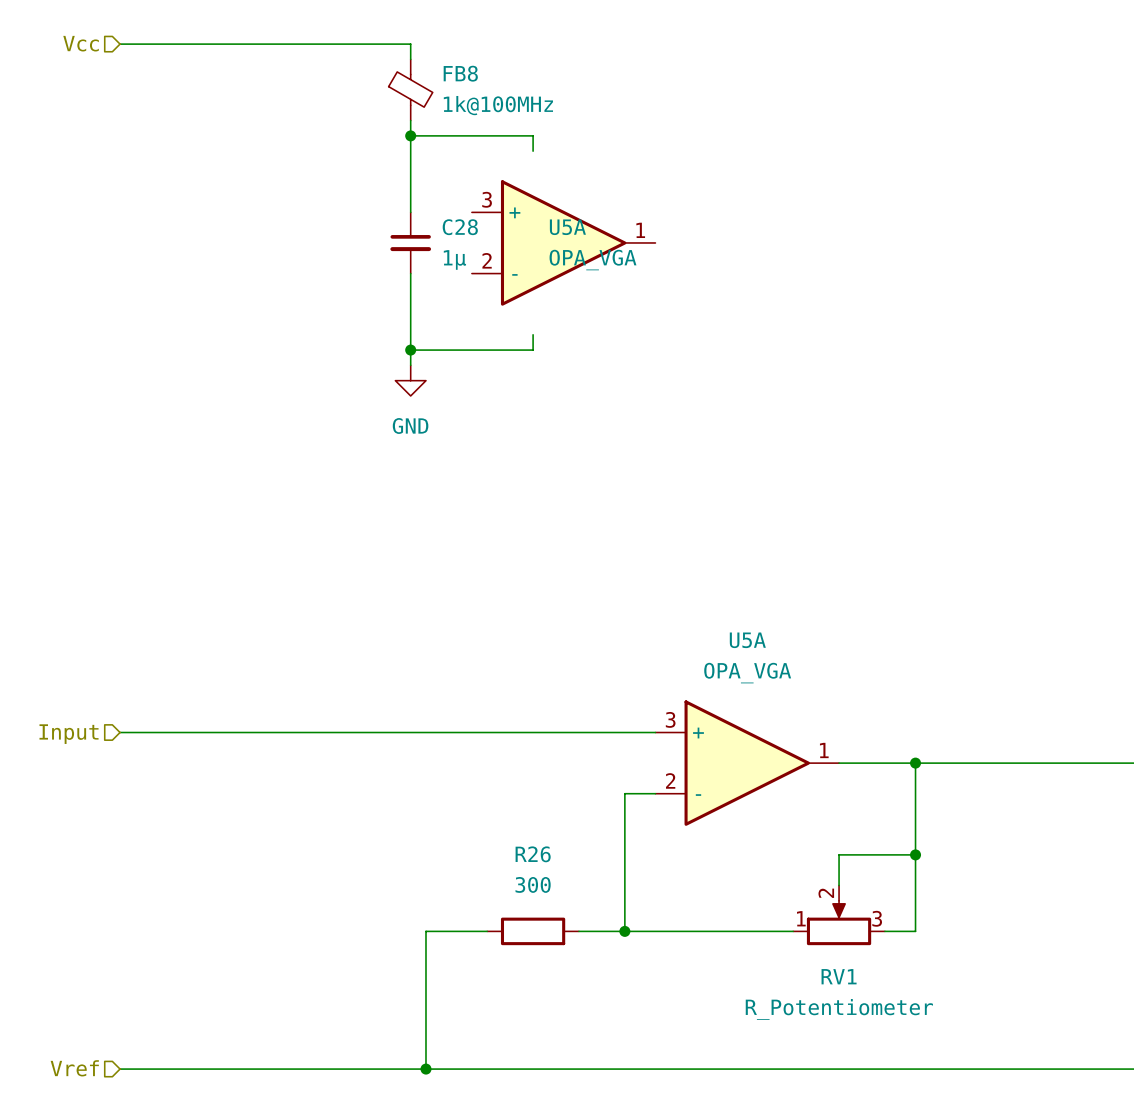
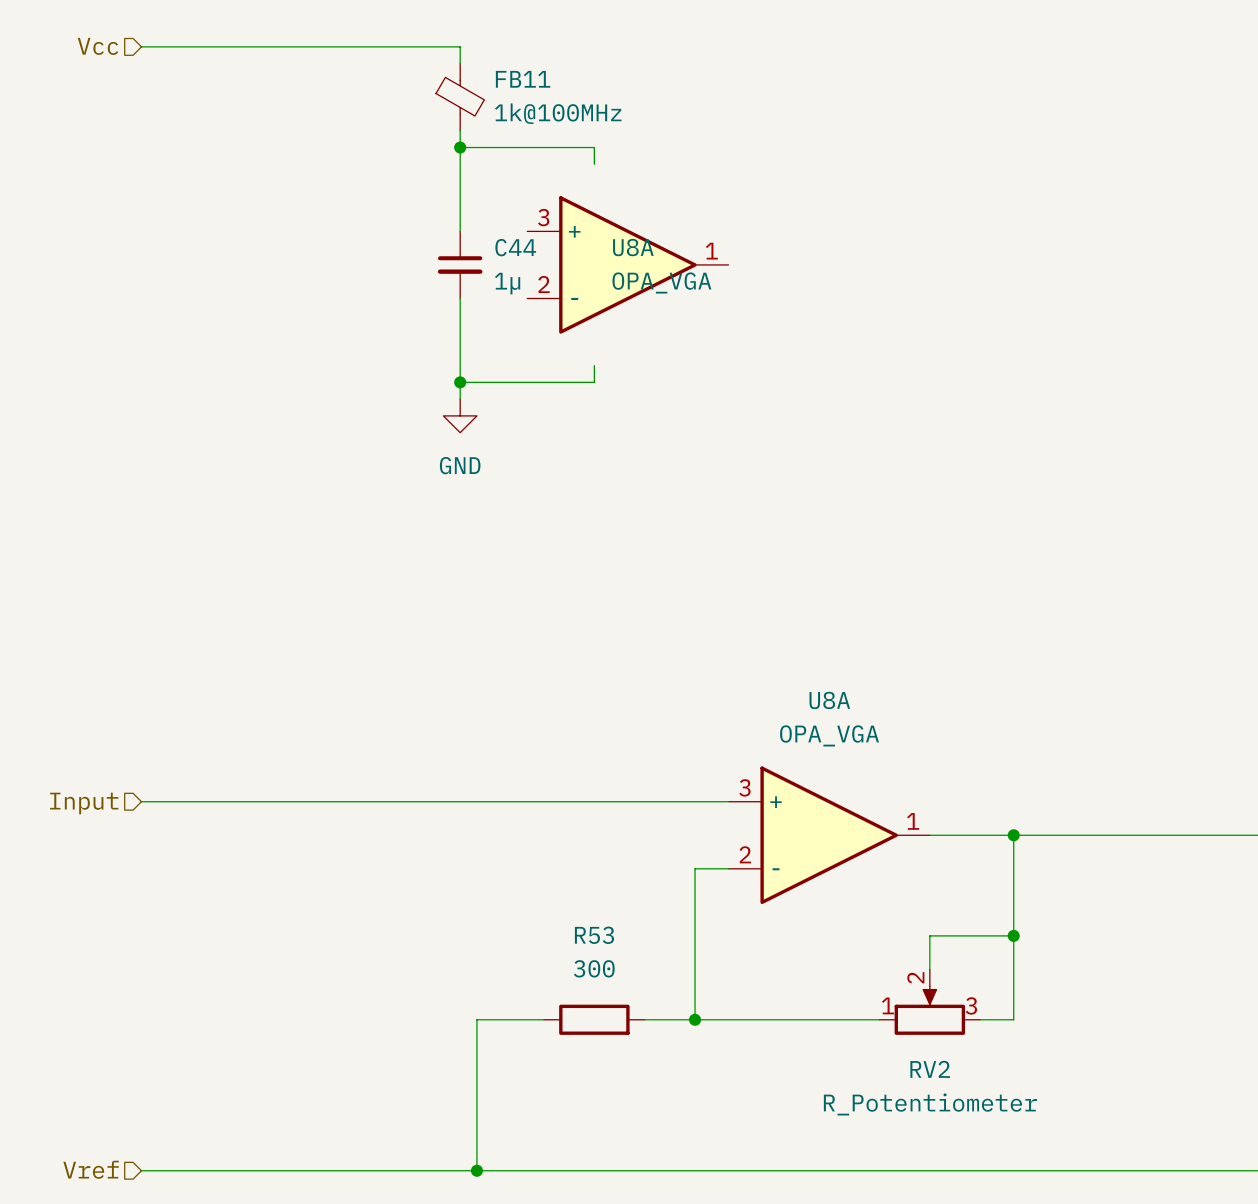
FB8 name: FB8 (460, 73) -> FB11 (523, 79)
C28 name: C28 (460, 227) -> C44 (515, 247)
U5A name: U5A (567, 227) -> U8A (633, 247)
U5A name: U5A (747, 640) -> U8A (829, 700)
R26 name: R26 (533, 854) -> R53 (594, 935)
RV1 name: RV1 (839, 976) -> RV2 (930, 1069)

